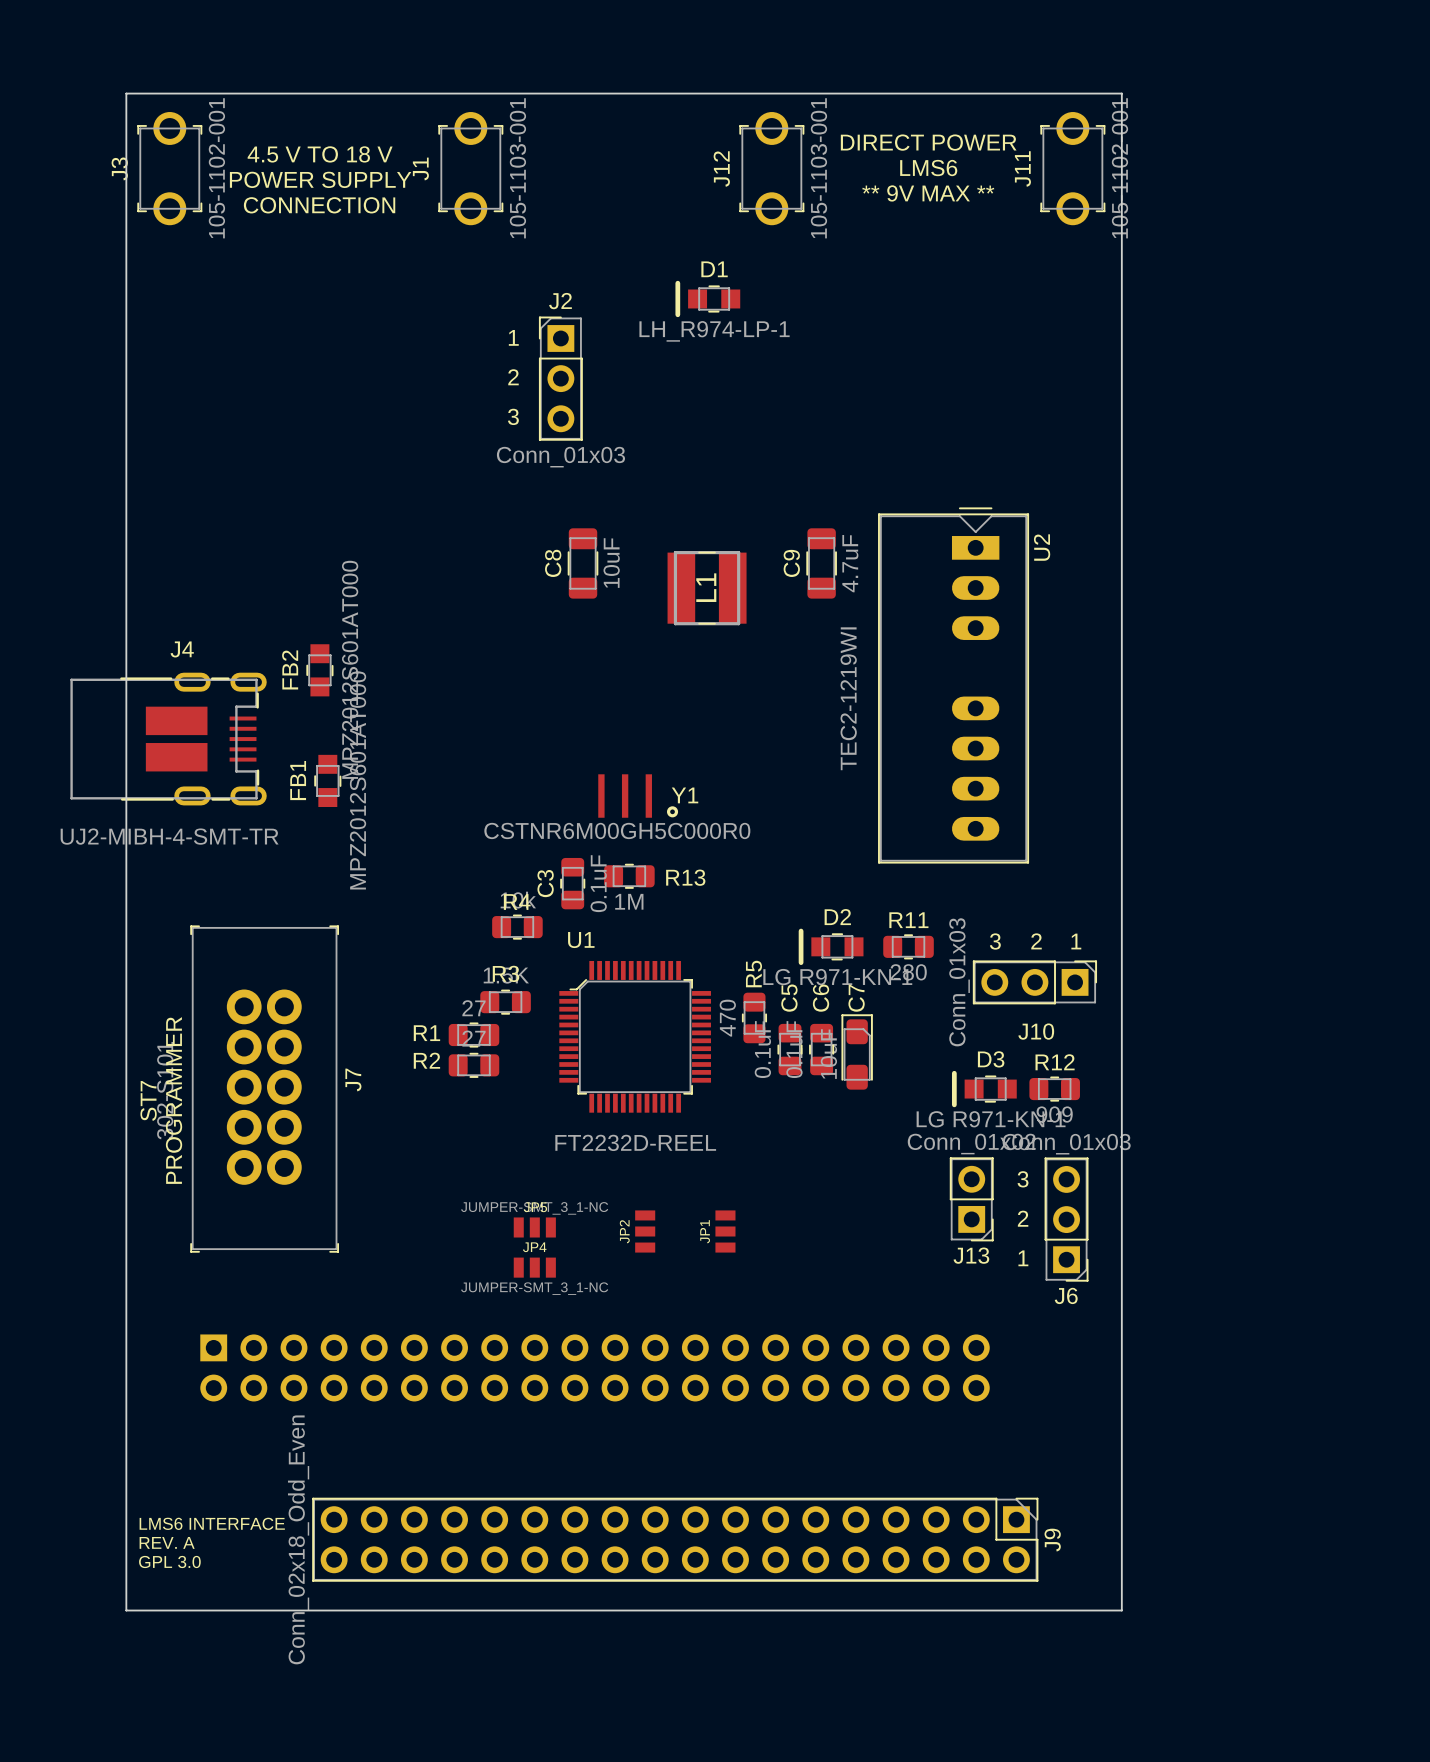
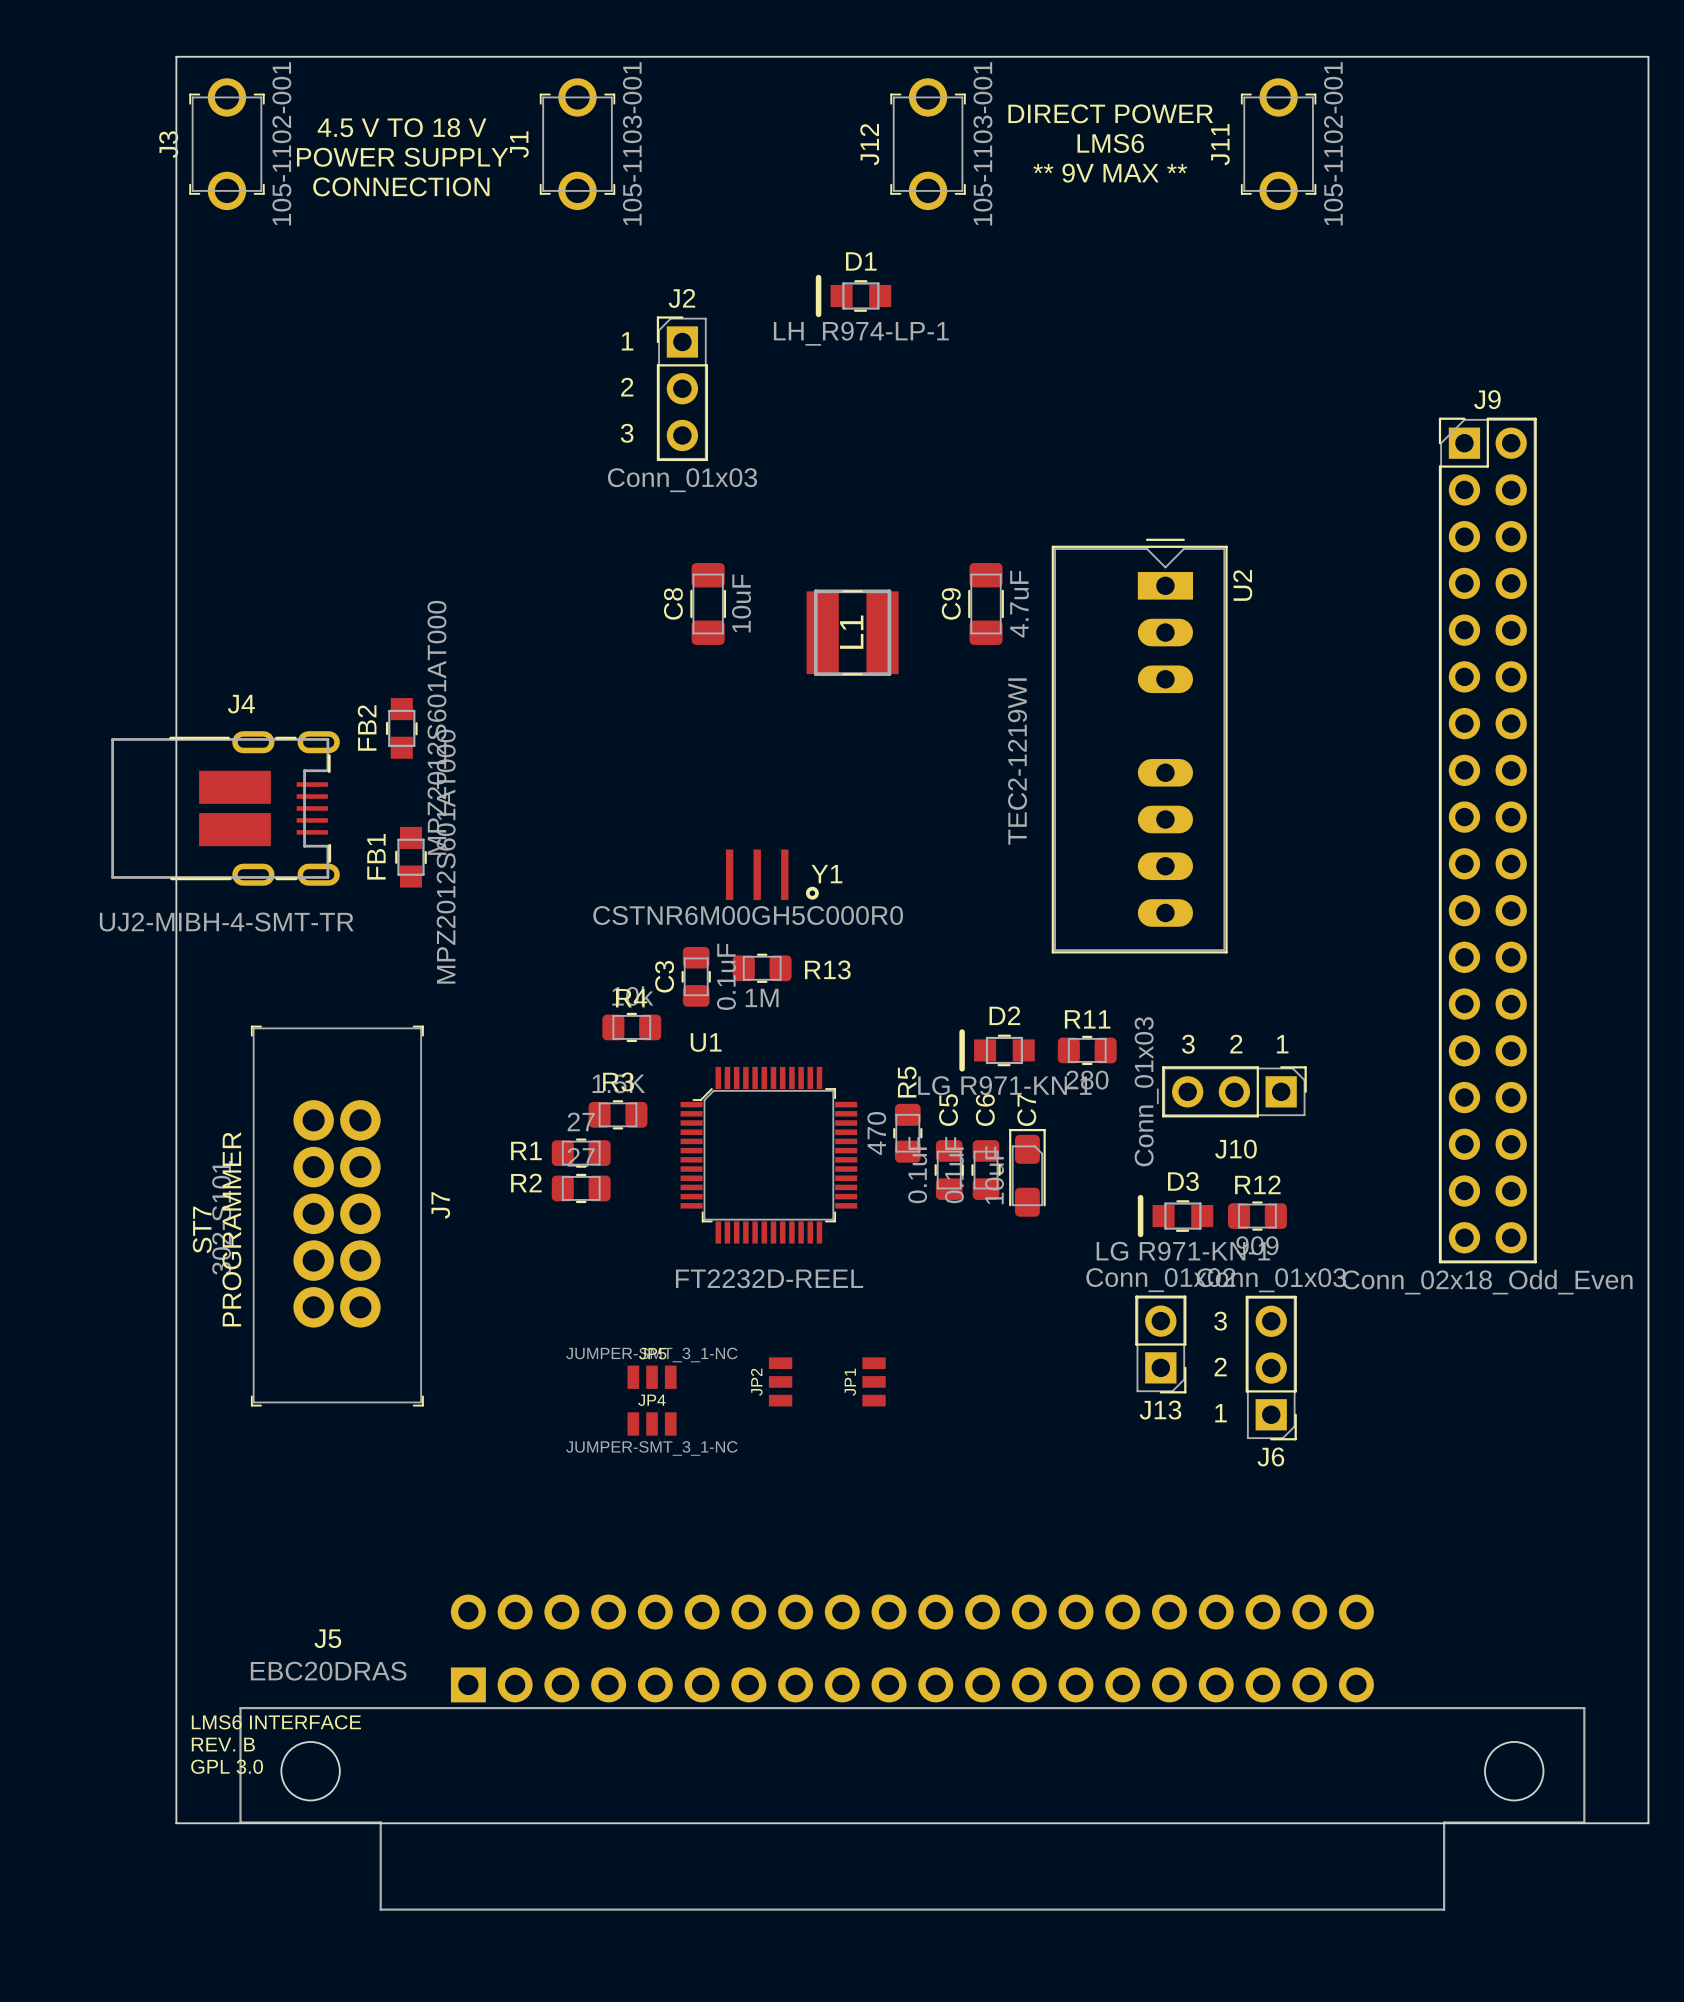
board edge: (1121, 93) (1121, 1610) -> (1335, 56) (1648, 56) (1648, 1823) (1335, 1823)
part: (595, 1367) -> none
J9 rotation: 0° (675, 1539) -> 90° counterclockwise (1487, 840)
J9 position: (675, 1539) -> (1487, 840)
text: REV. A (167, 1542) -> REV. B (223, 1744)
J5: none -> EBC20DRAS (912, 1752)

